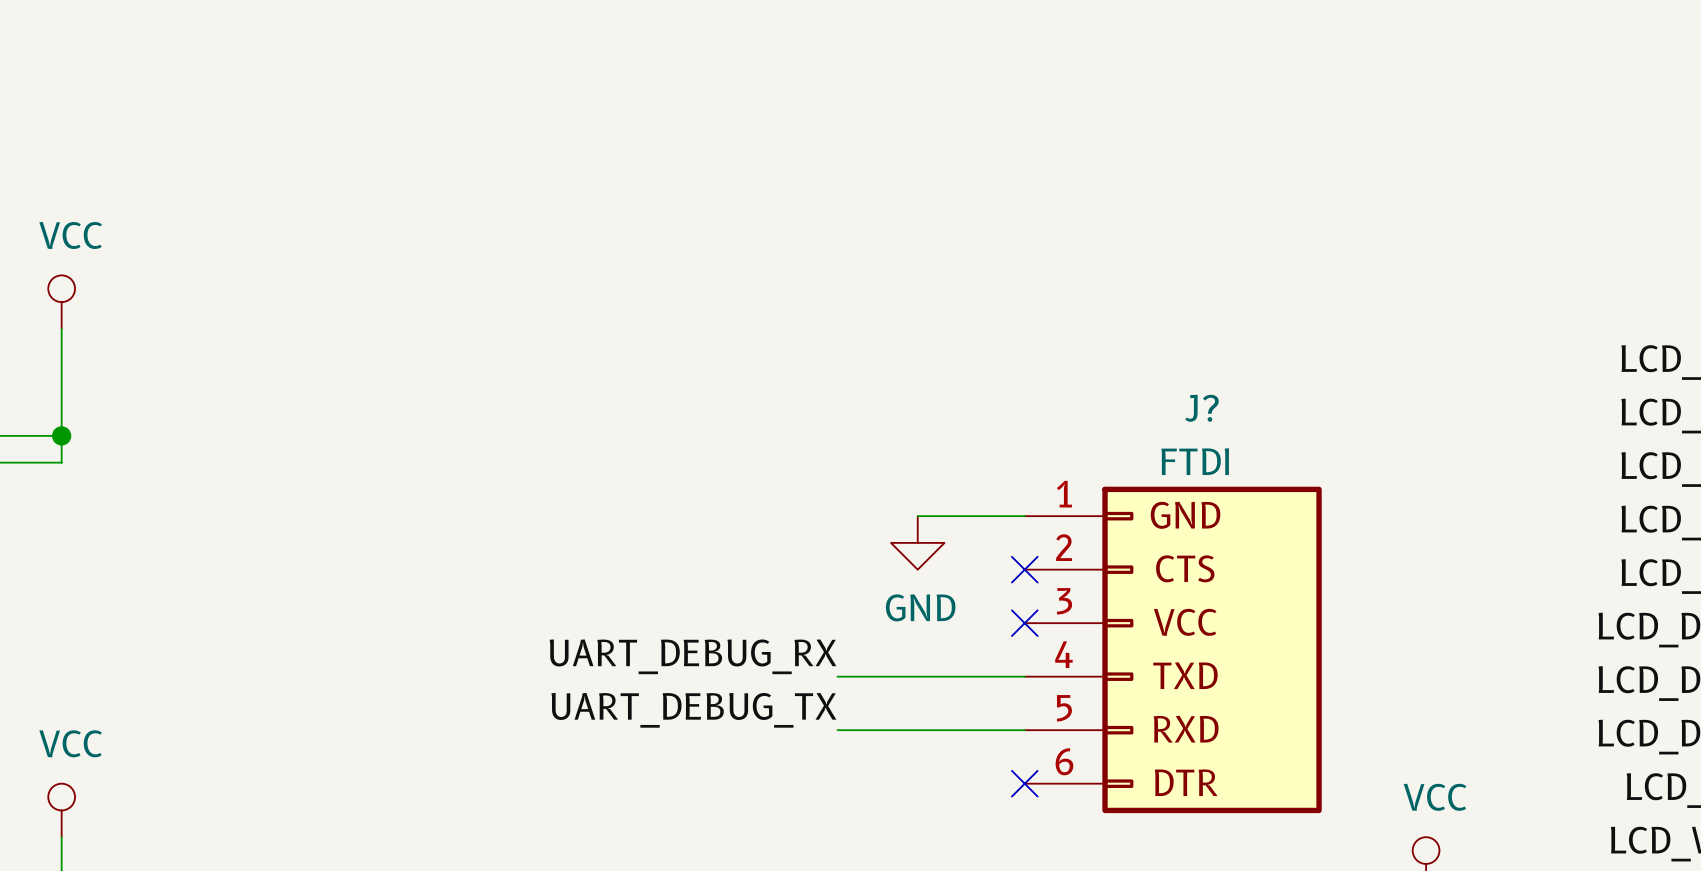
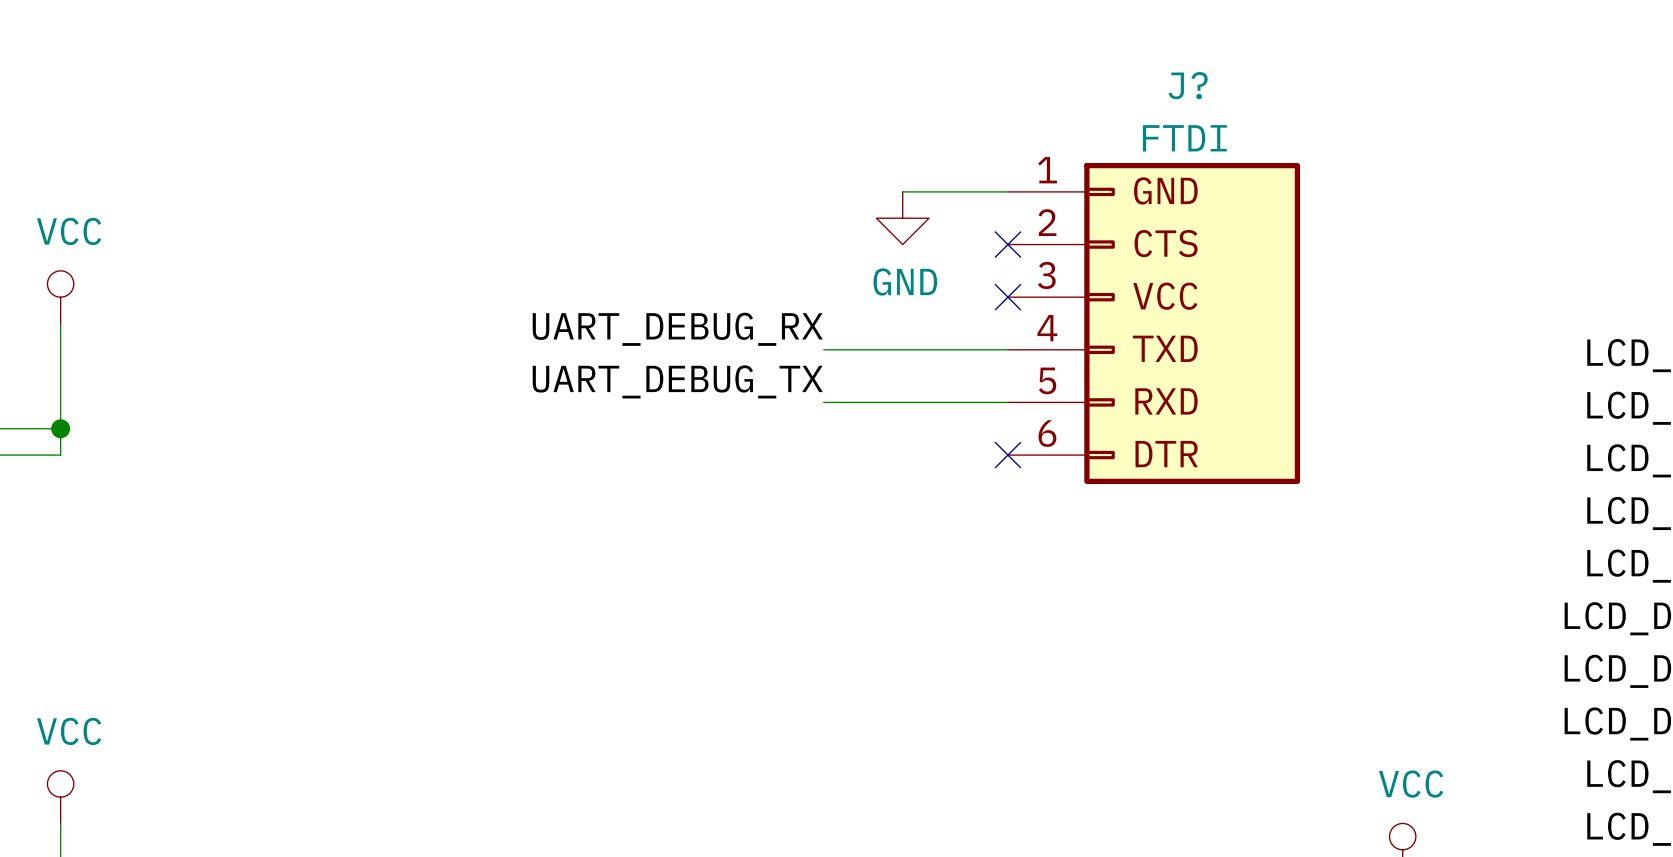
no-connect mark: none -> (1007, 244)
no-connect mark: none -> (1007, 297)
no-connect mark: none -> (1007, 455)
wire: (917, 516) (1024, 516) -> (902, 191) (1007, 191)
power symbol position: GND (917, 542) -> GND (902, 218)
no-connect mark: (1024, 569) -> none
no-connect mark: (1024, 623) -> none
J? position: (1173, 649) -> (1154, 323)
label position: UART_DEBUG_RX (693, 656) -> UART_DEBUG_RX (677, 329)
wire: (837, 676) (1024, 676) -> (823, 349) (1007, 349)
label position: UART_DEBUG_TX (693, 710) -> UART_DEBUG_TX (677, 381)
wire: (837, 730) (1024, 730) -> (823, 402) (1007, 402)
no-connect mark: (1024, 783) -> none

